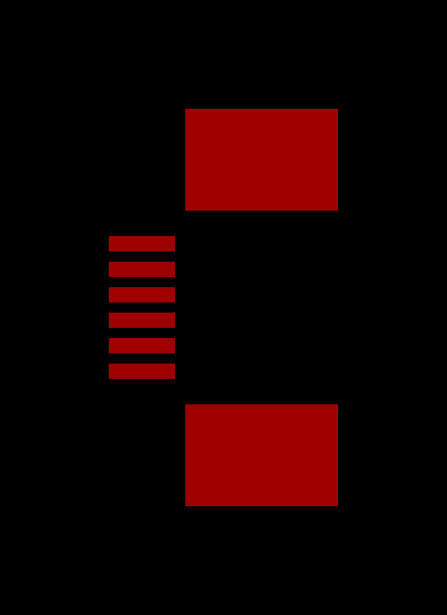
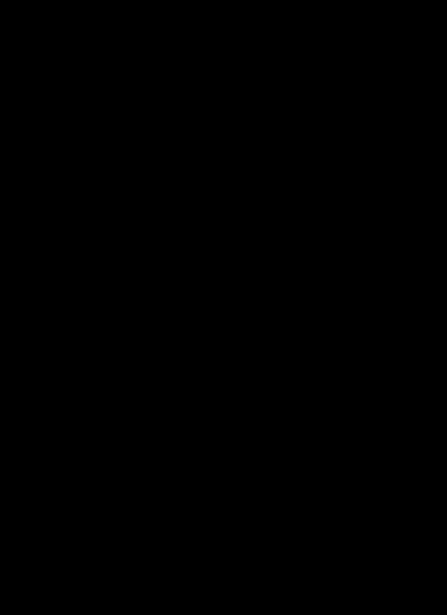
part: (223, 307) -> none

